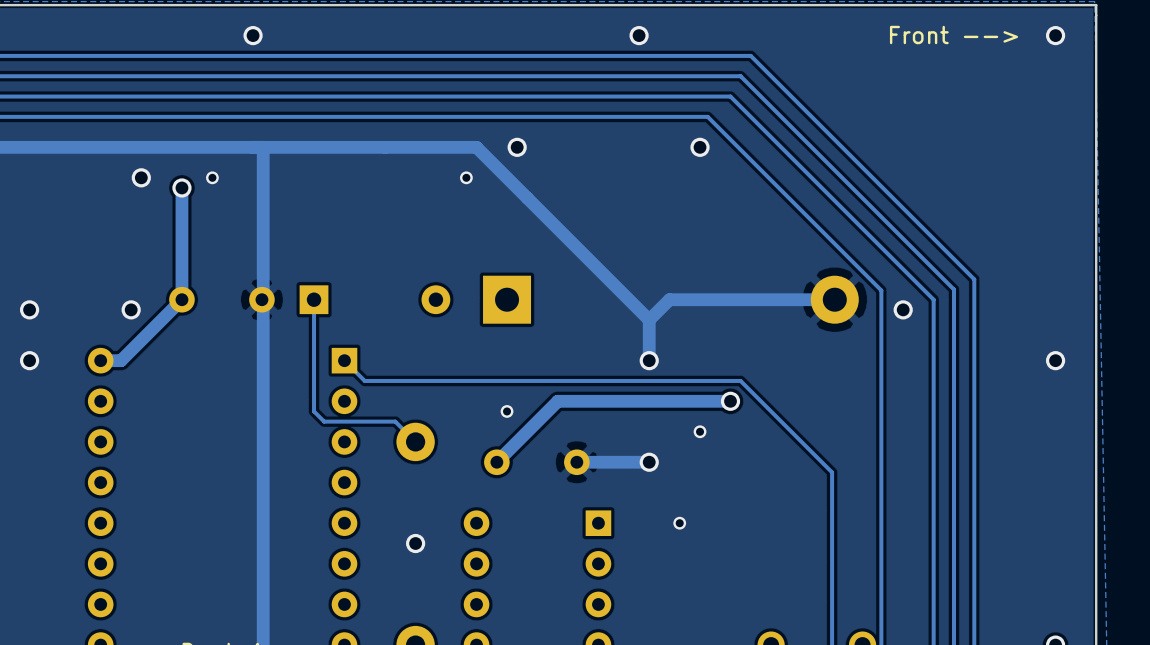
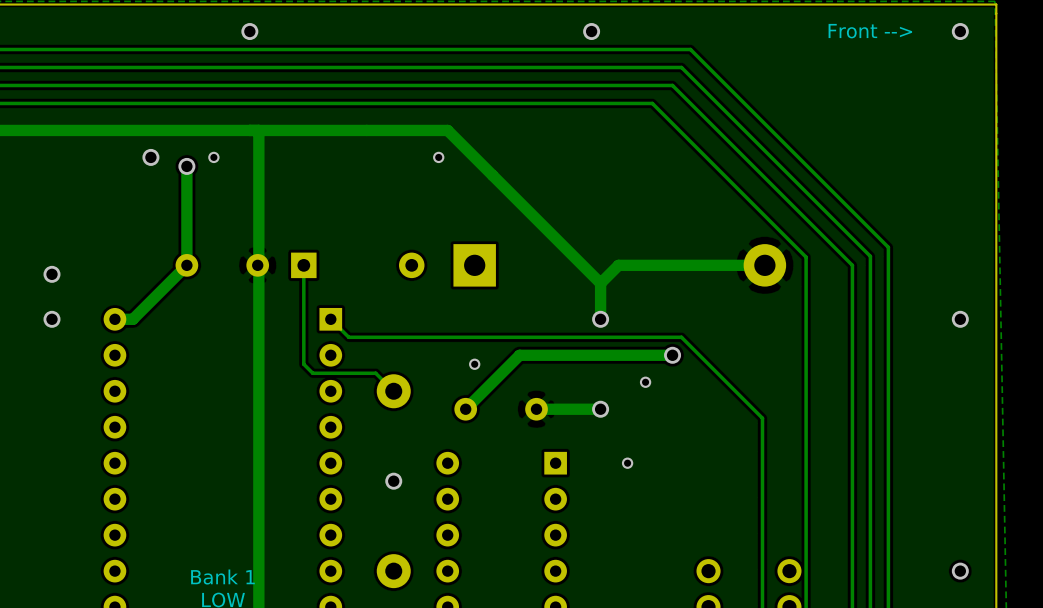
via: (517, 147) -> none
via: (700, 147) -> none
via: (131, 309) -> none
via: (903, 309) -> none

